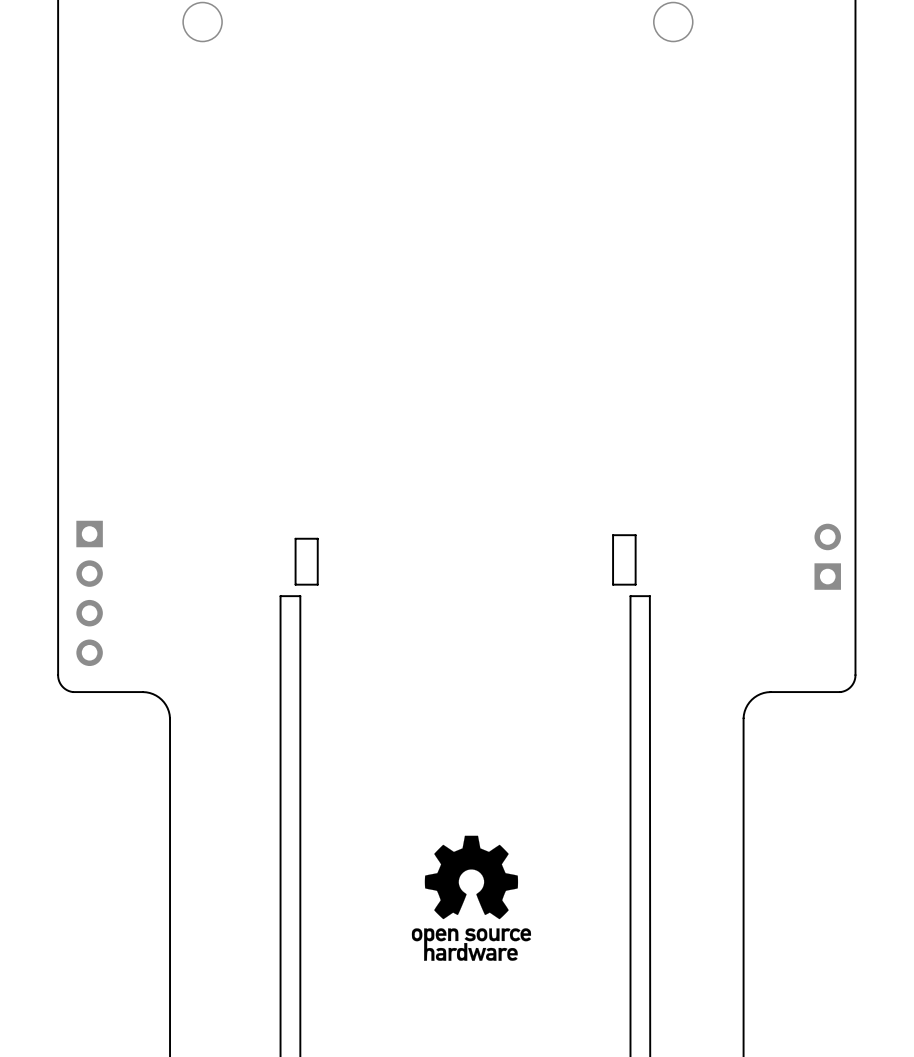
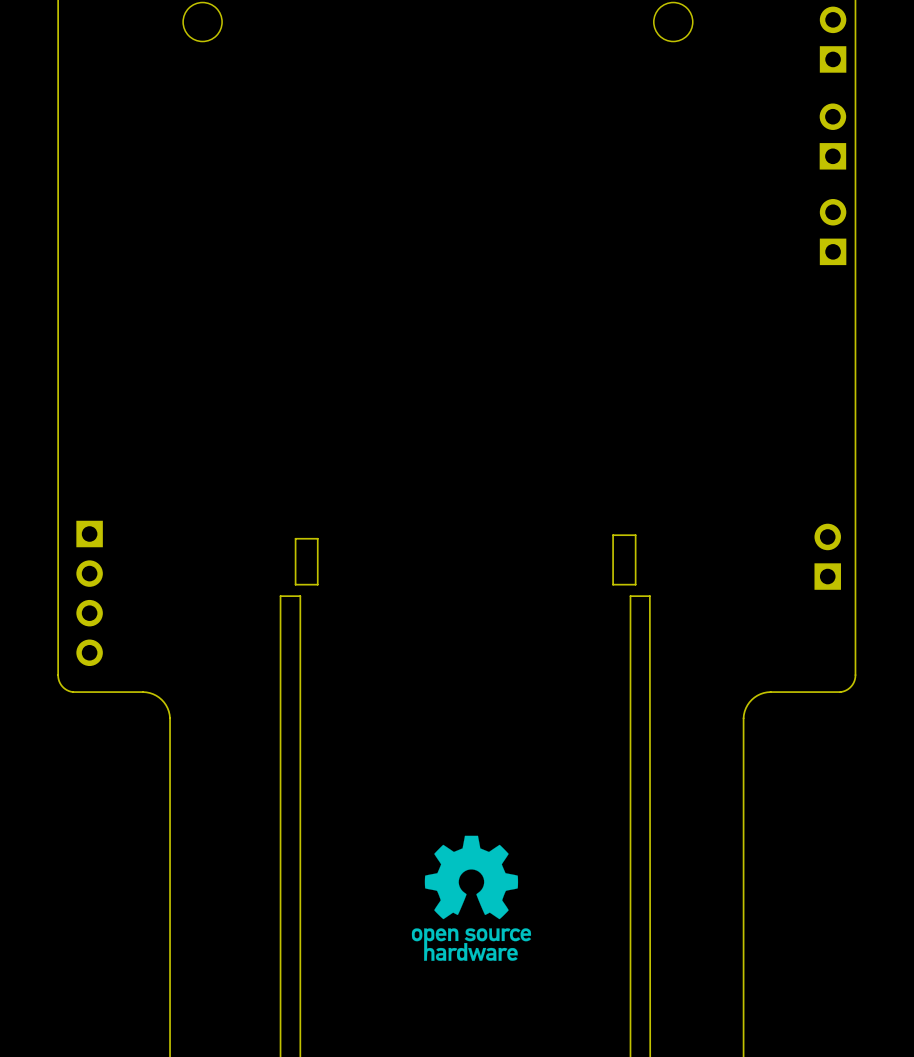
part: none -> (833, 39)
part: none -> (832, 136)
part: none -> (833, 232)

